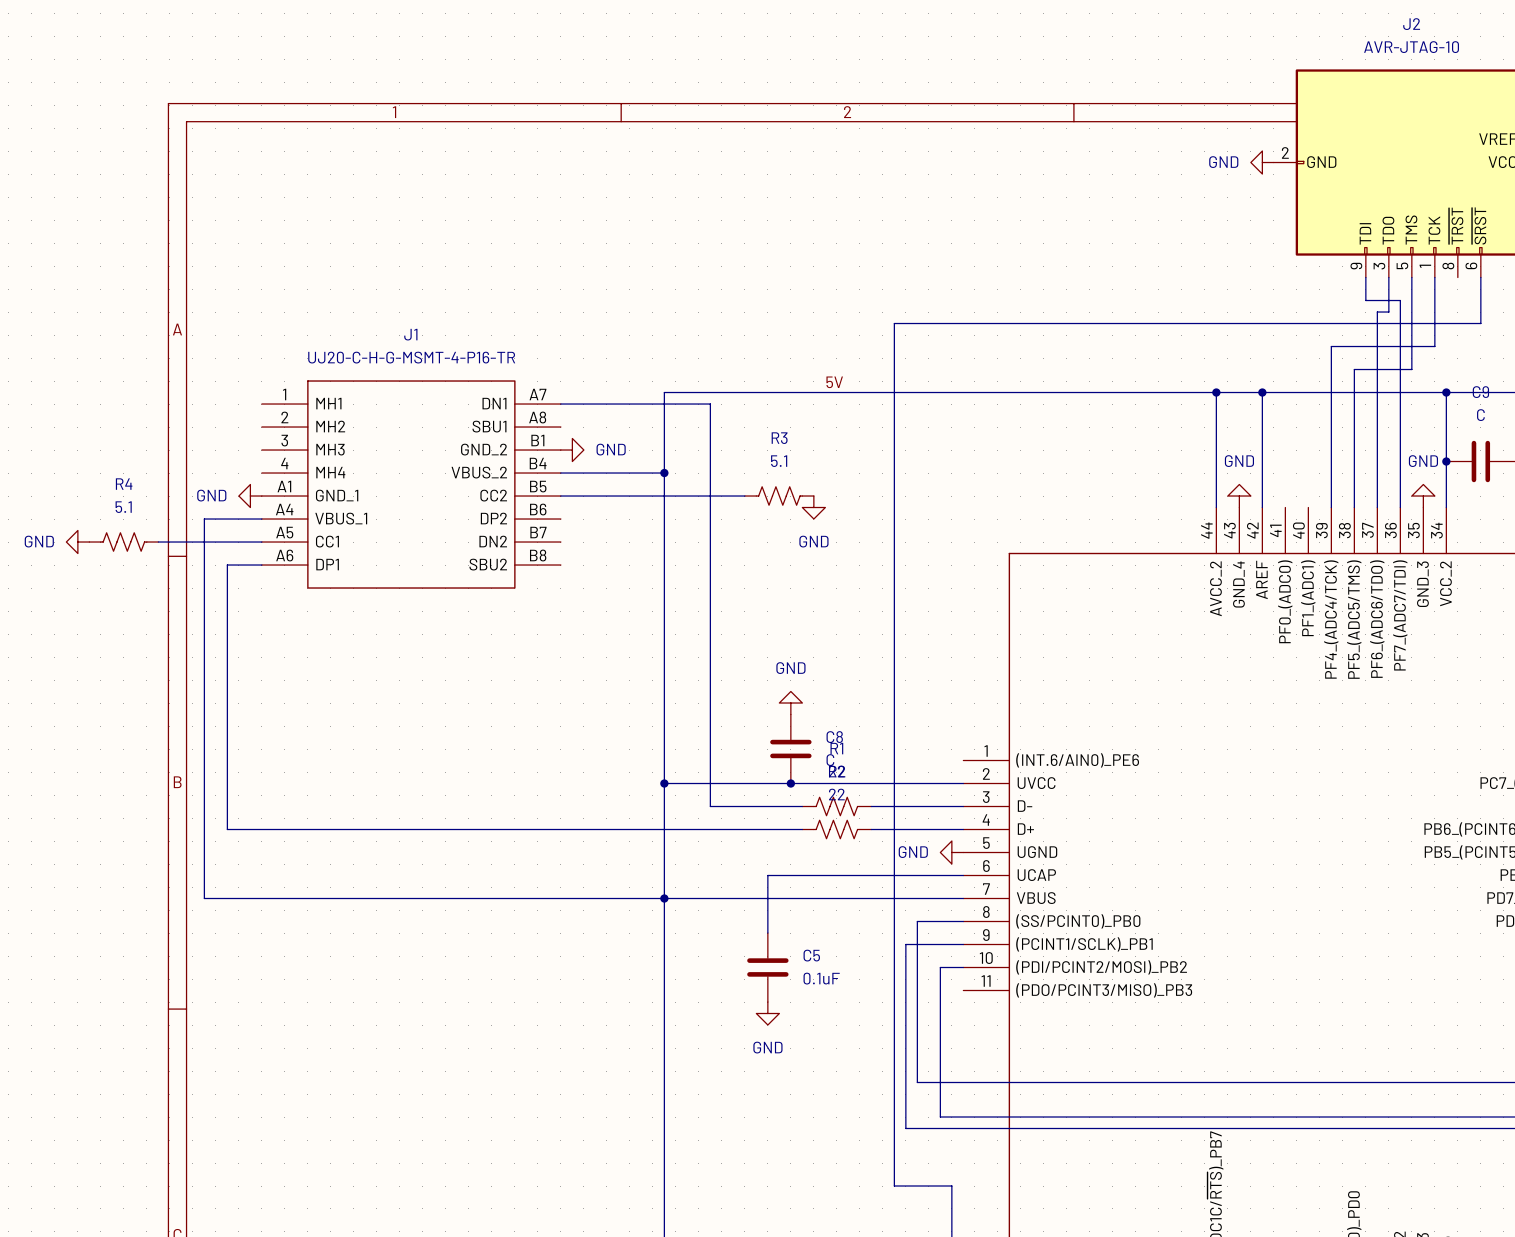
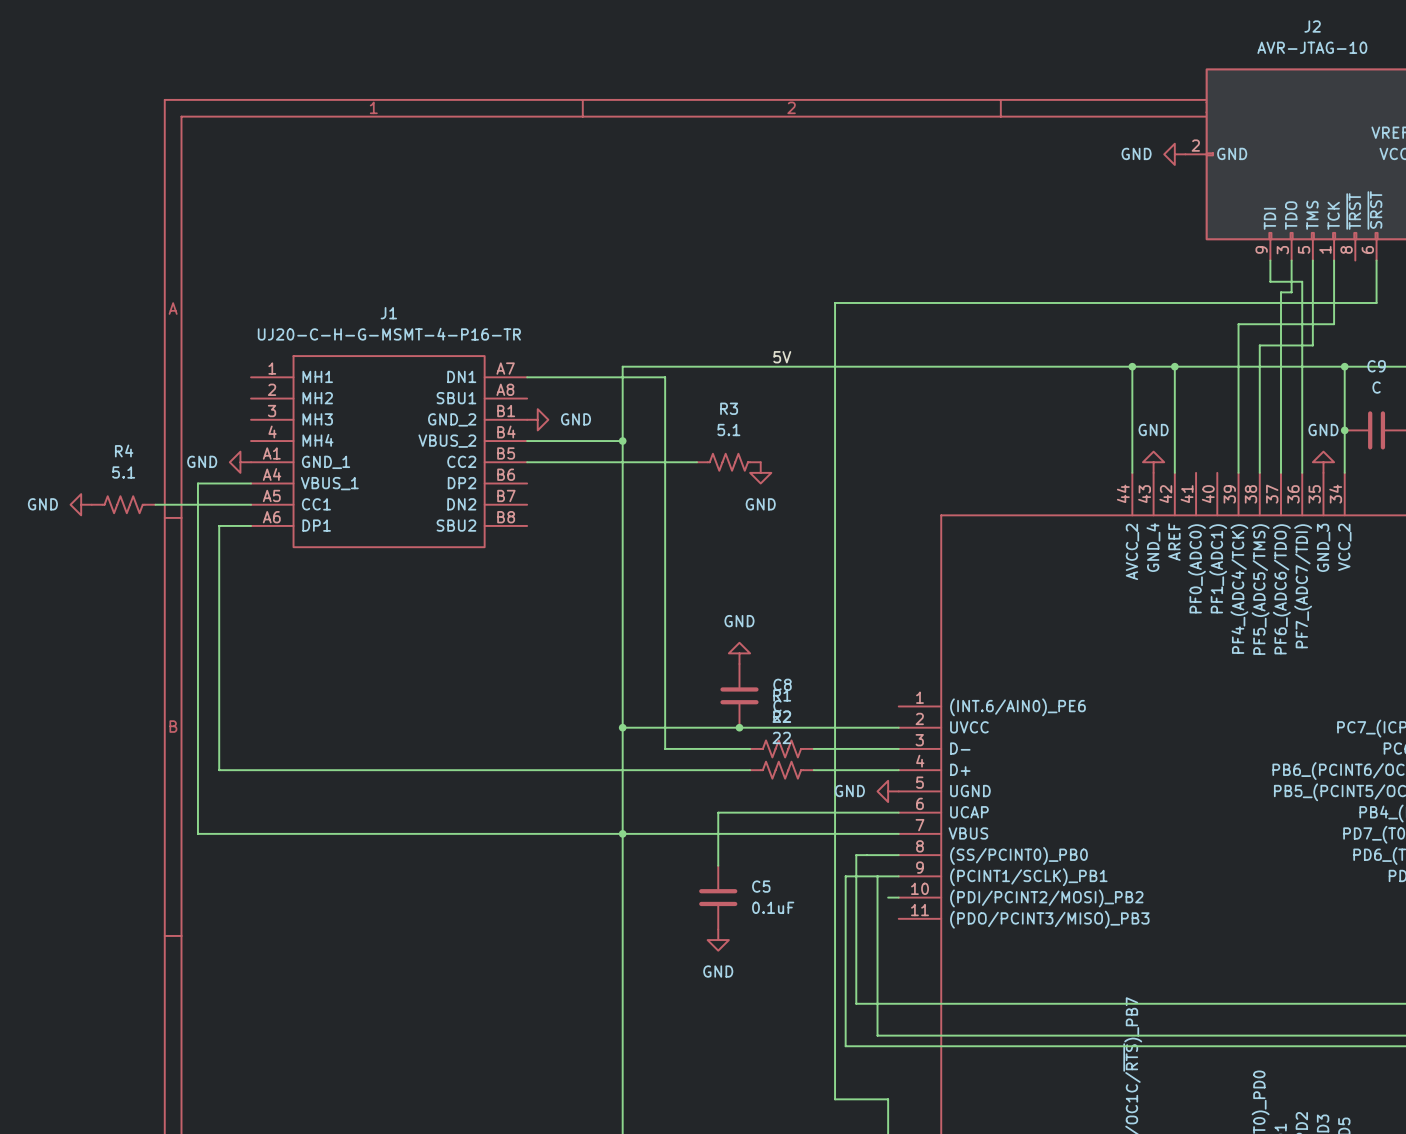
wire: (940, 967) (951, 967) -> (877, 897) (877, 876)

